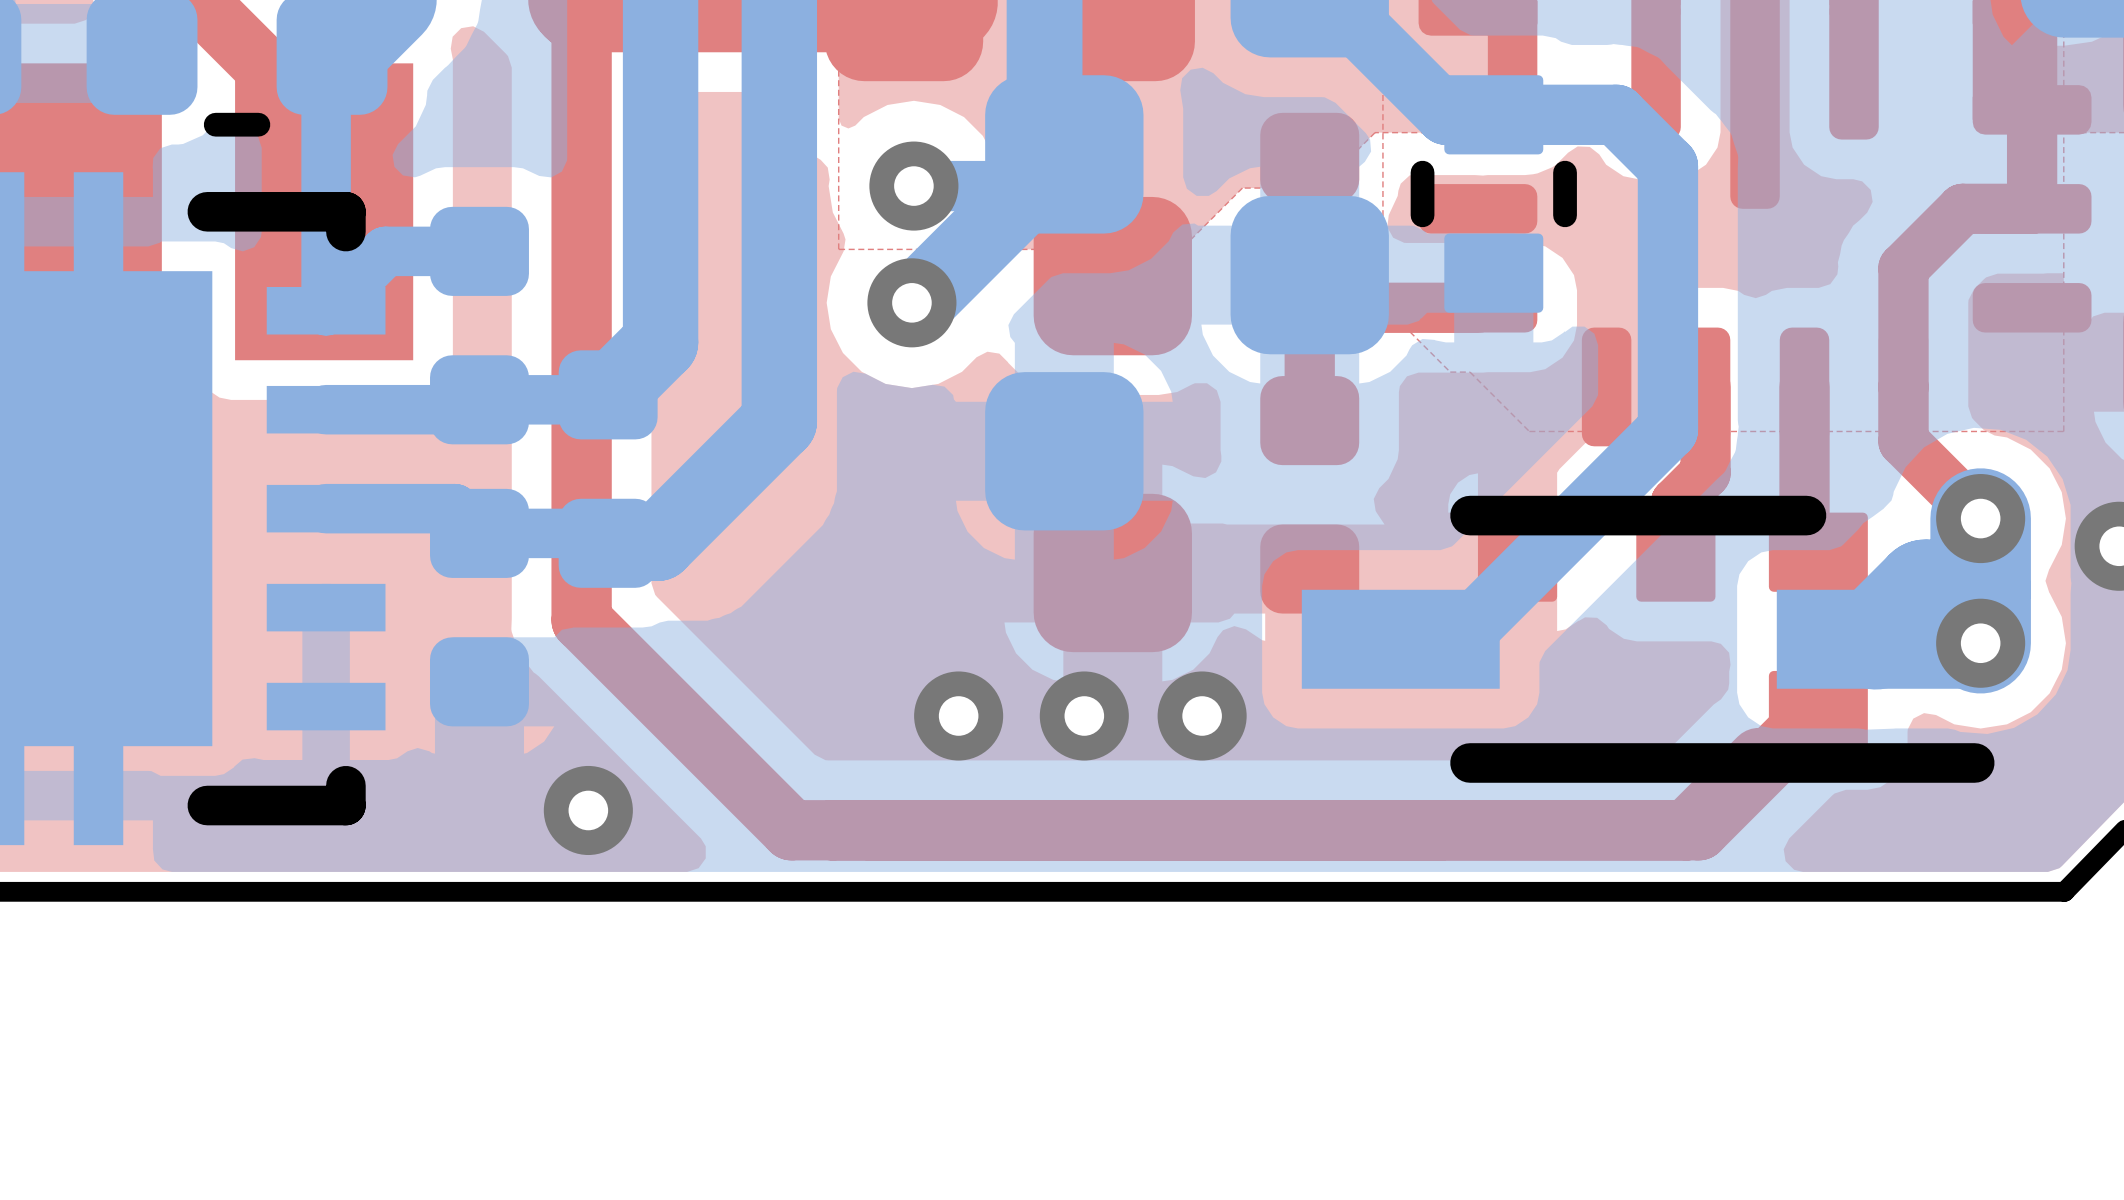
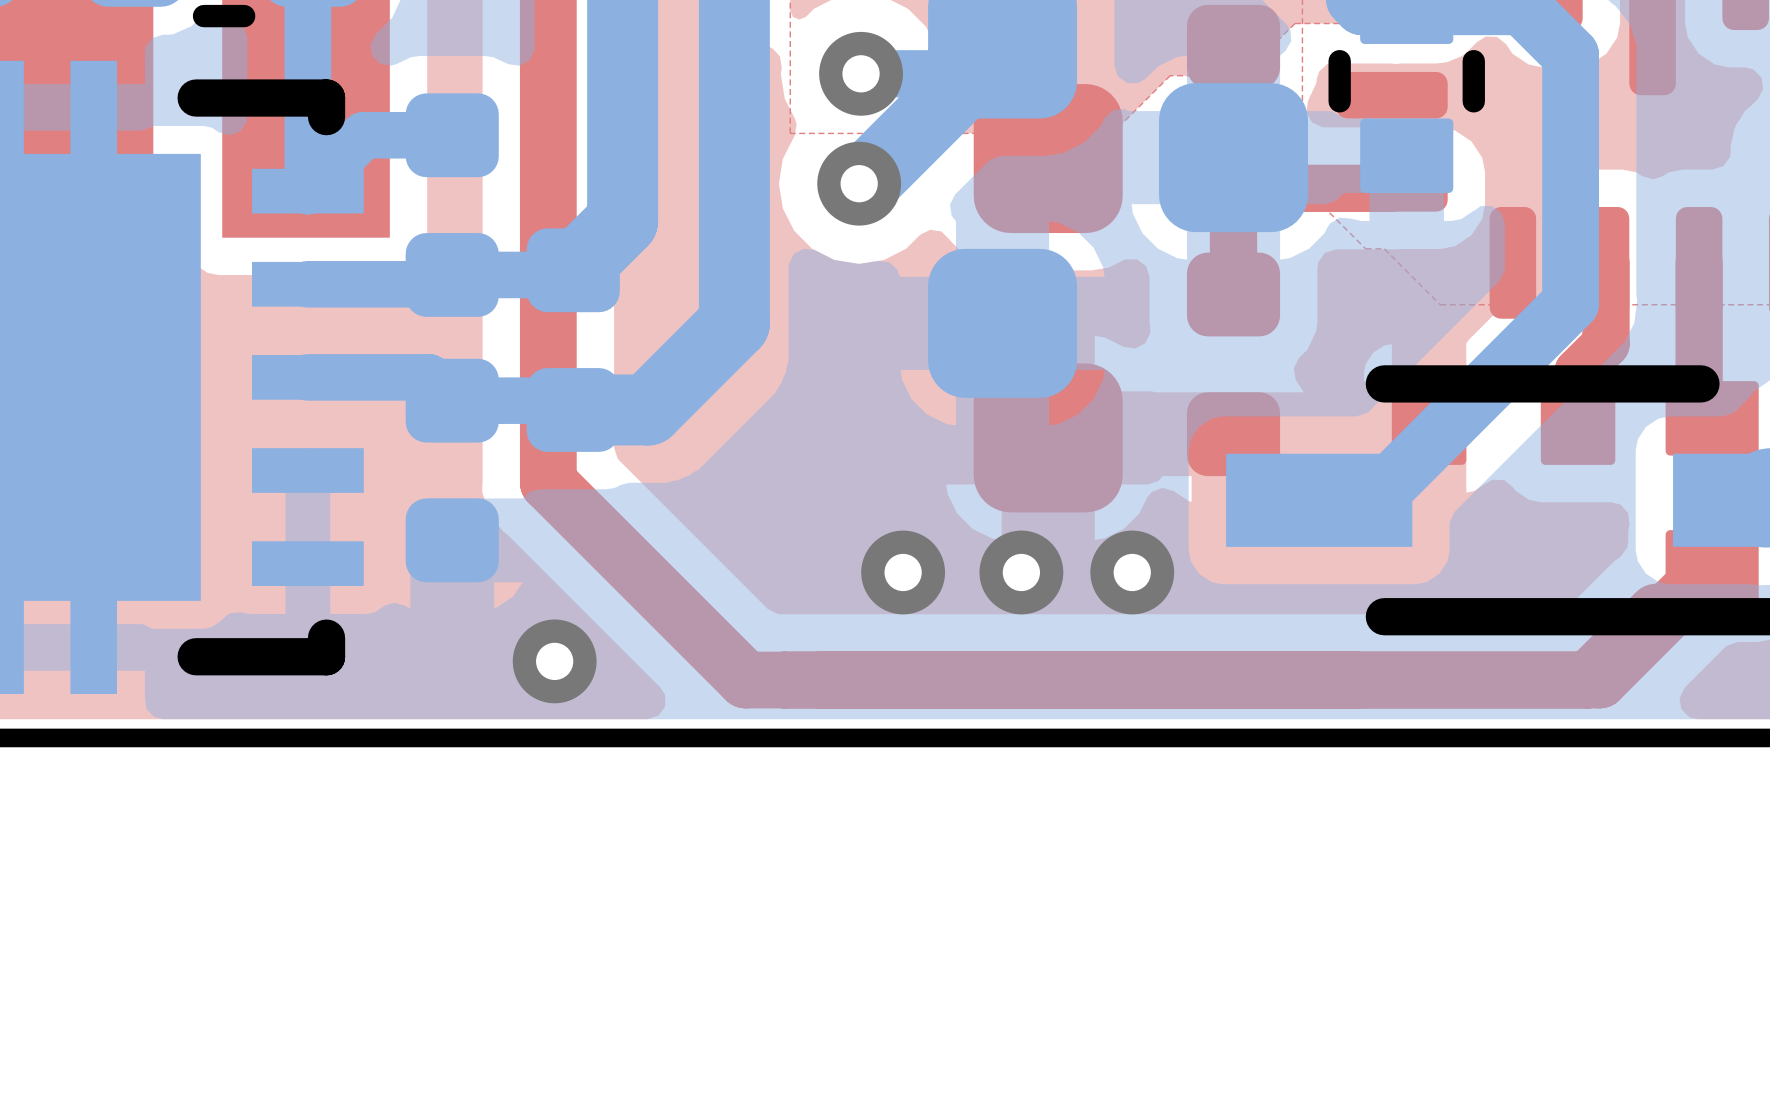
bottom track: (779, 421) (657, 543) -> (734, 295) (734, 323) (647, 409) (619, 409)

